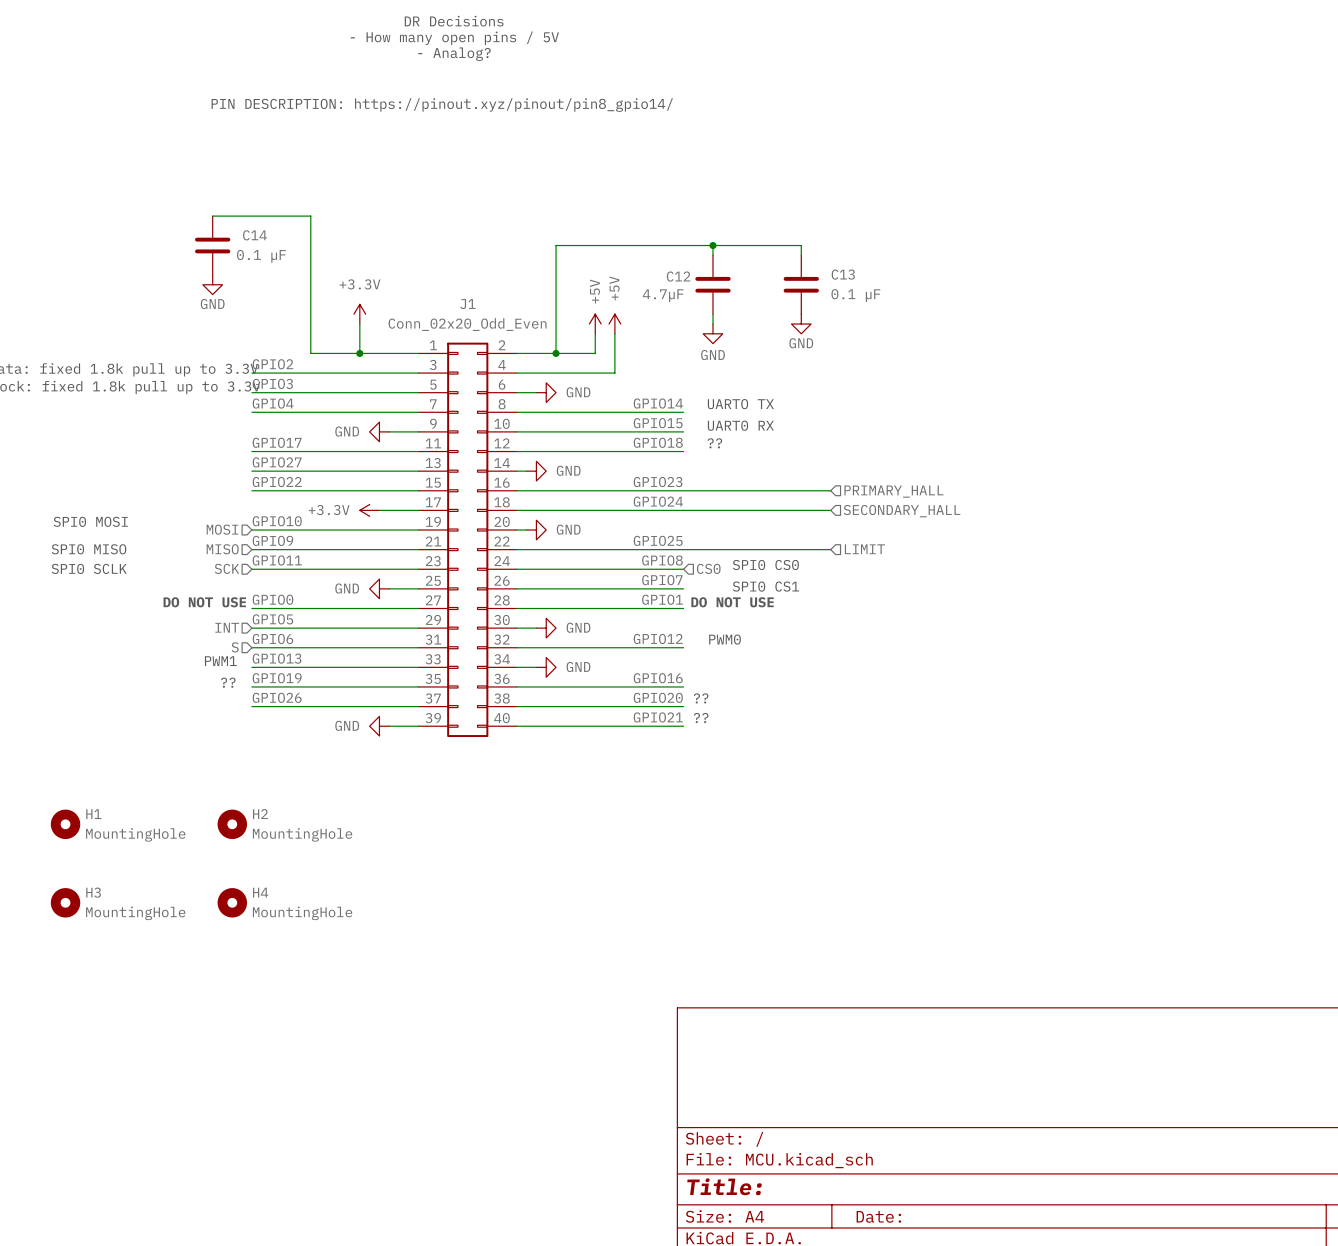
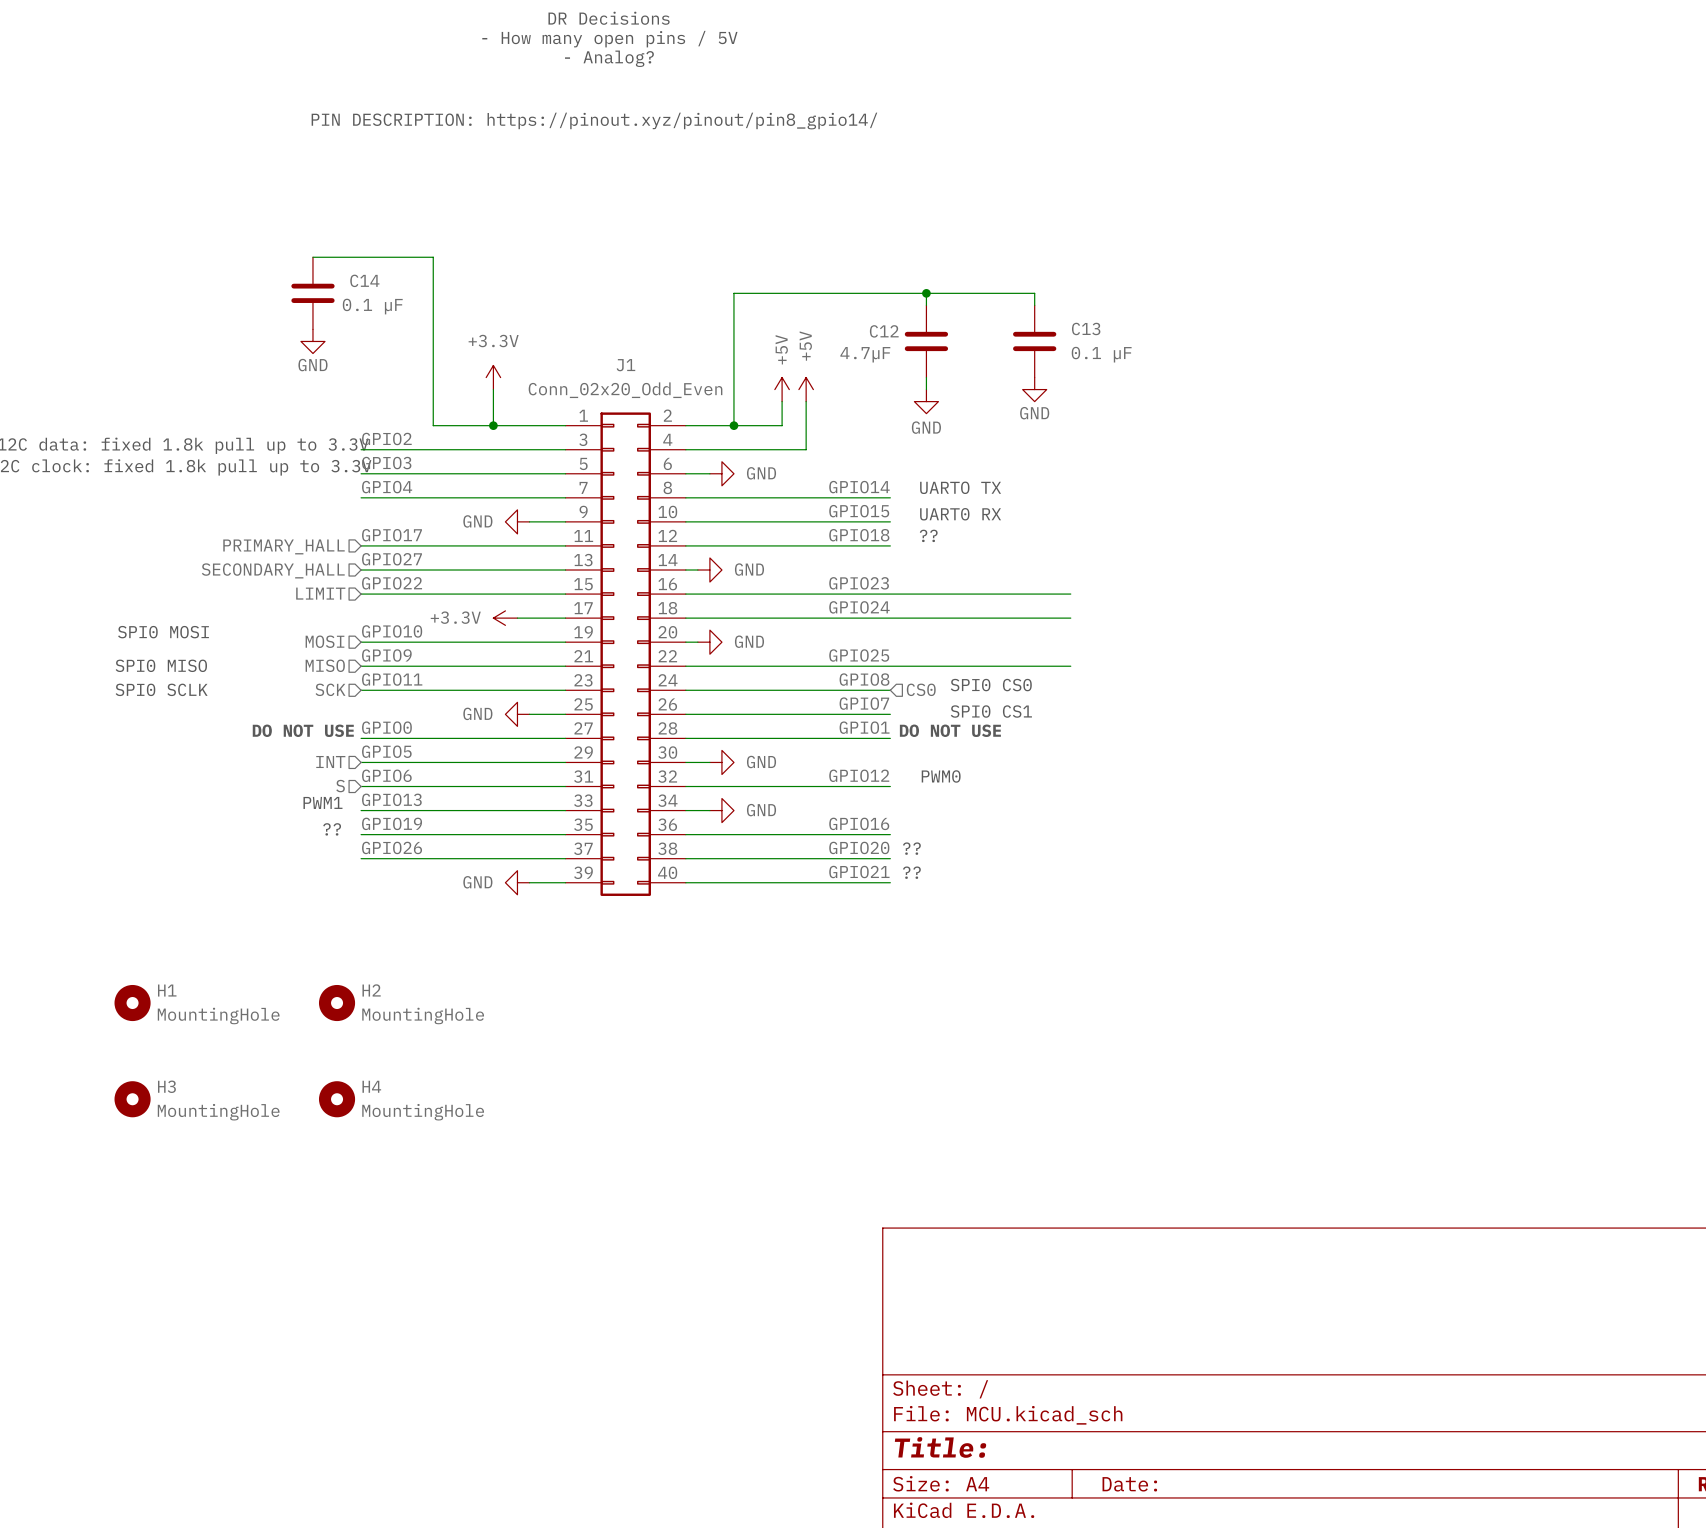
hierarchical label: none -> PRIMARY_HALL (283, 546)
hierarchical label: none -> SECONDARY_HALL (273, 570)
hierarchical label: none -> LIMIT (320, 593)
hierarchical label: PRIMARY_HALL (893, 491) -> none
hierarchical label: SECONDARY_HALL (902, 511) -> none
hierarchical label: LIMIT (864, 549) -> none

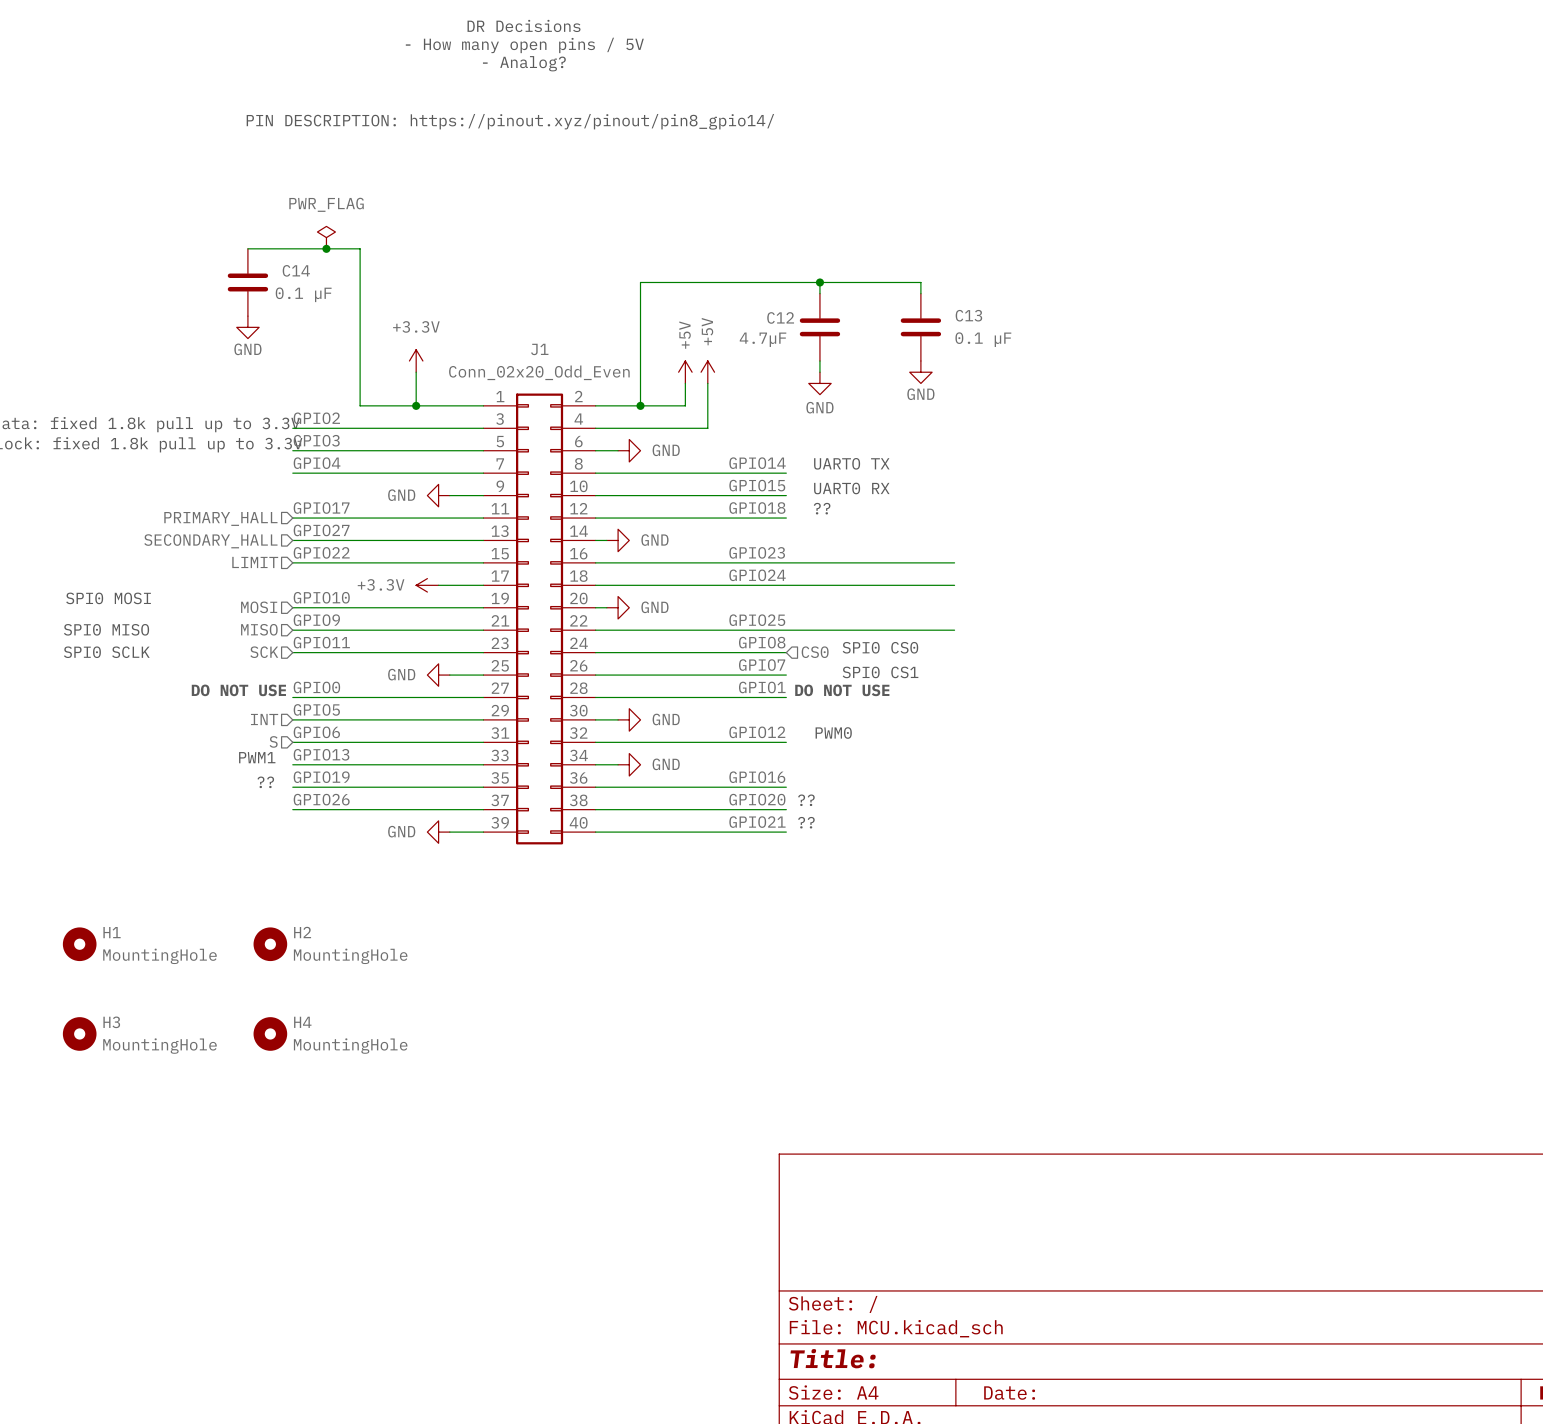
power symbol: none -> PWR_FLAG (326, 237)
junction: none -> (326, 248)

